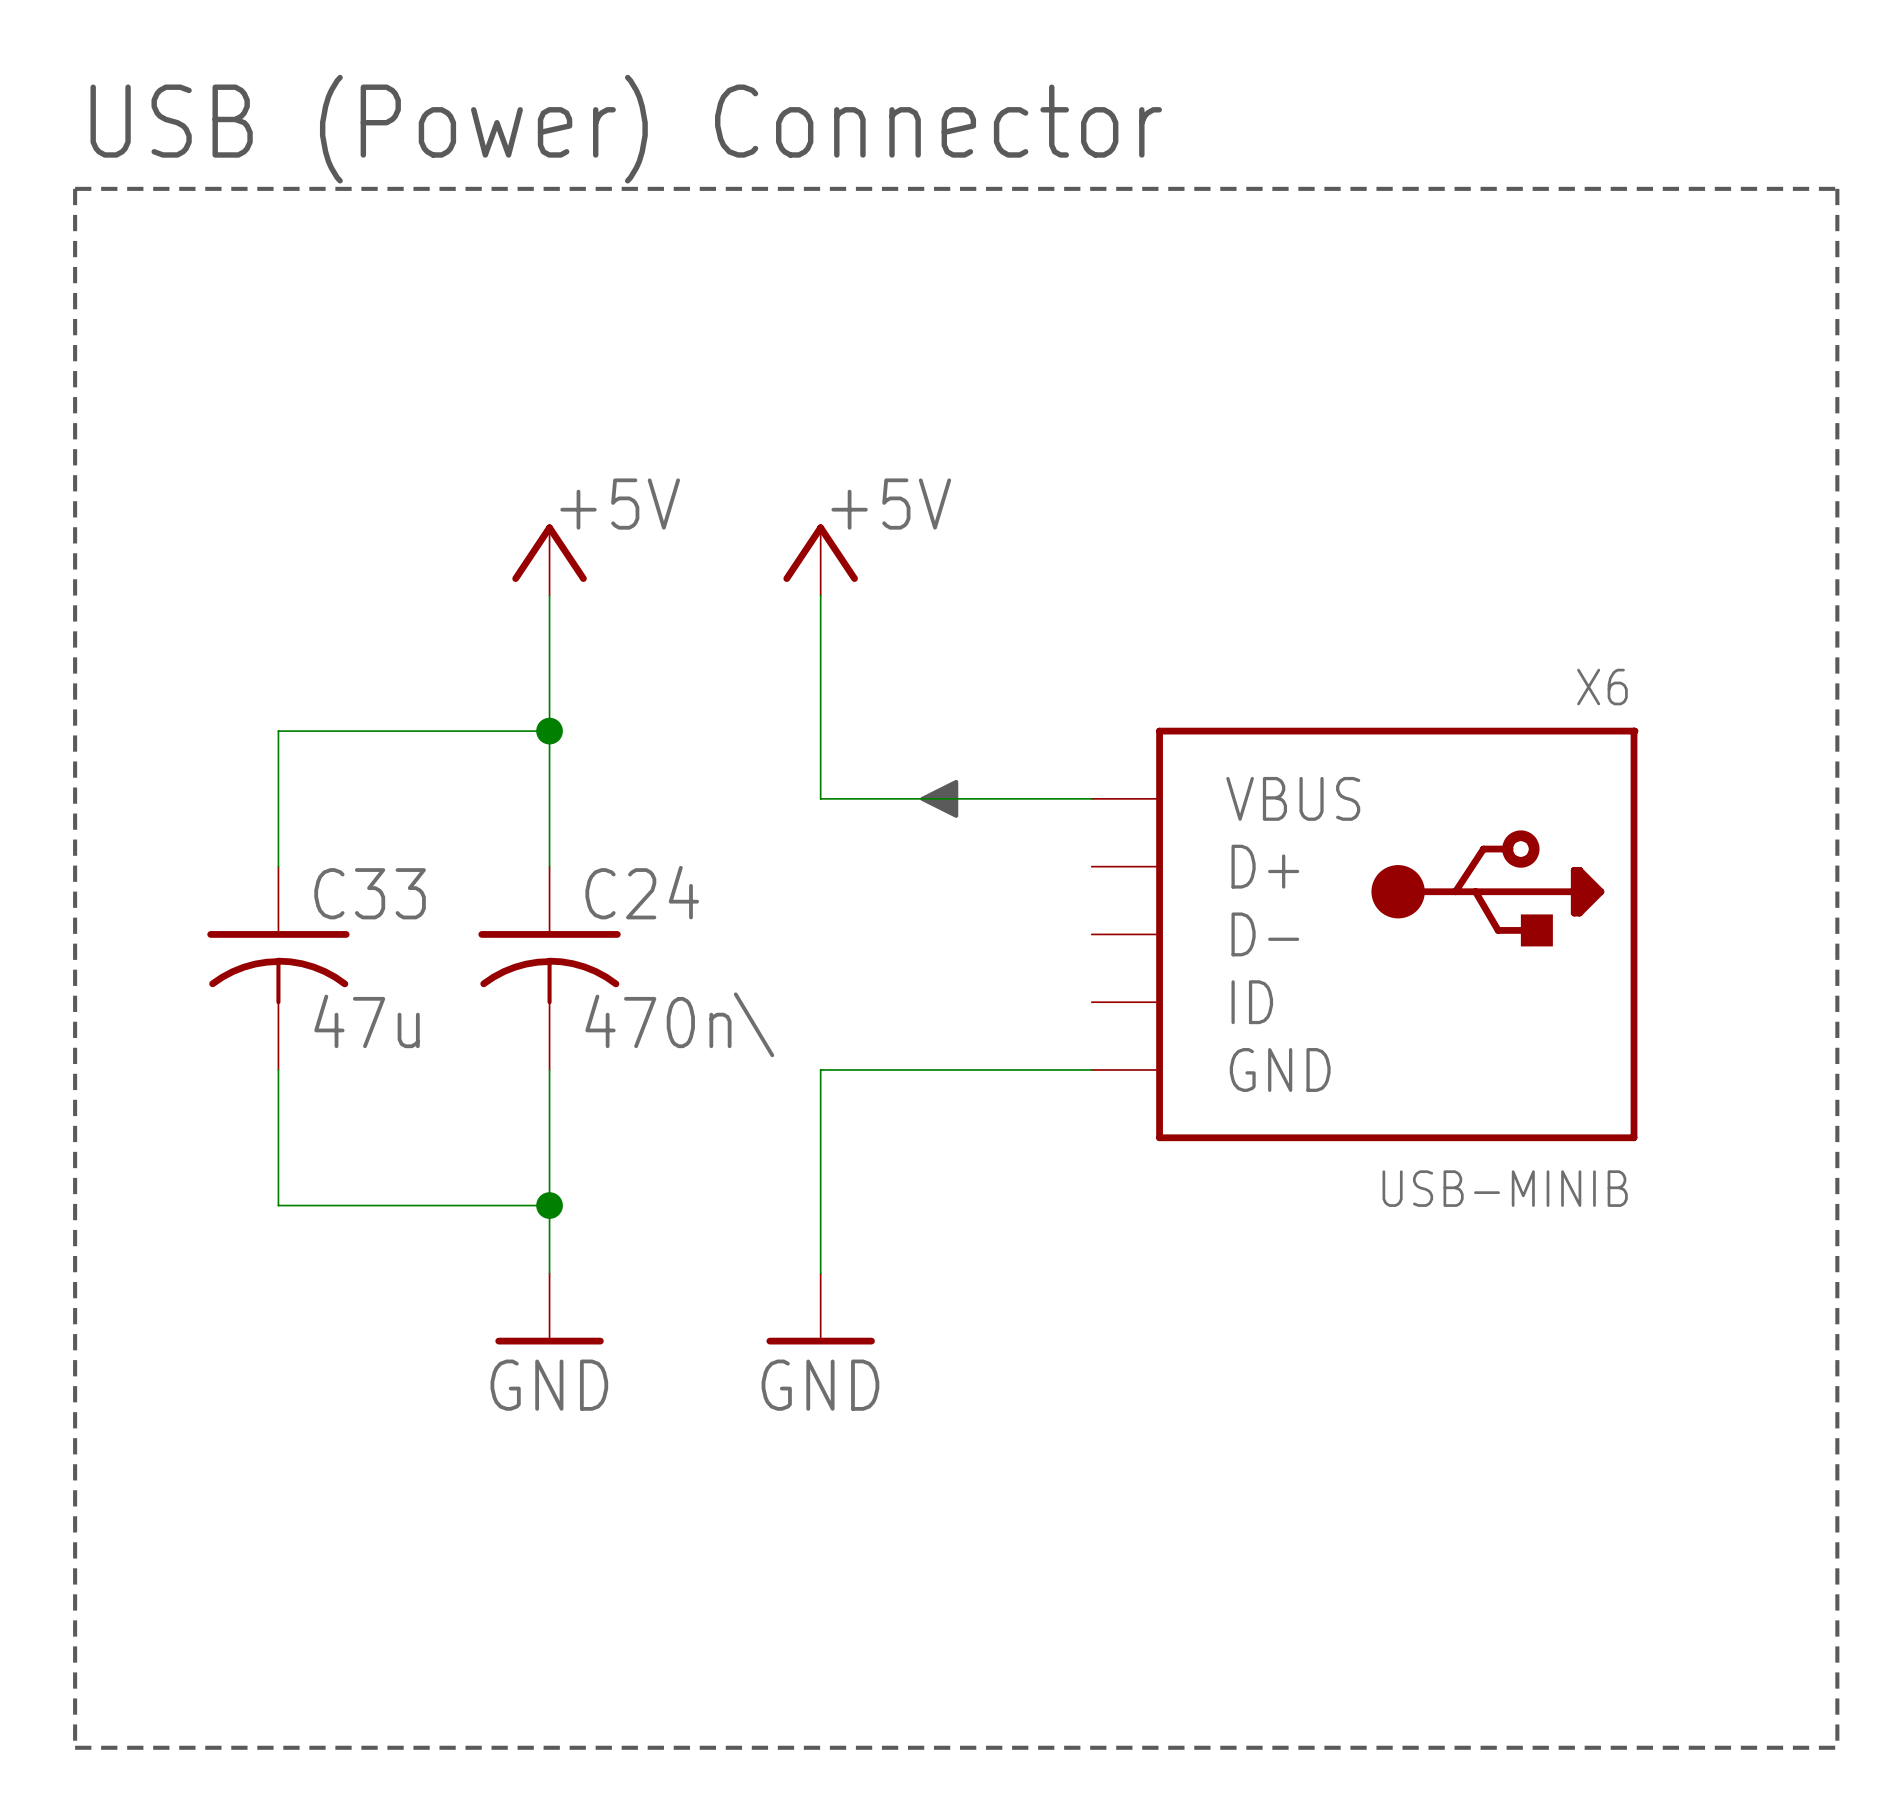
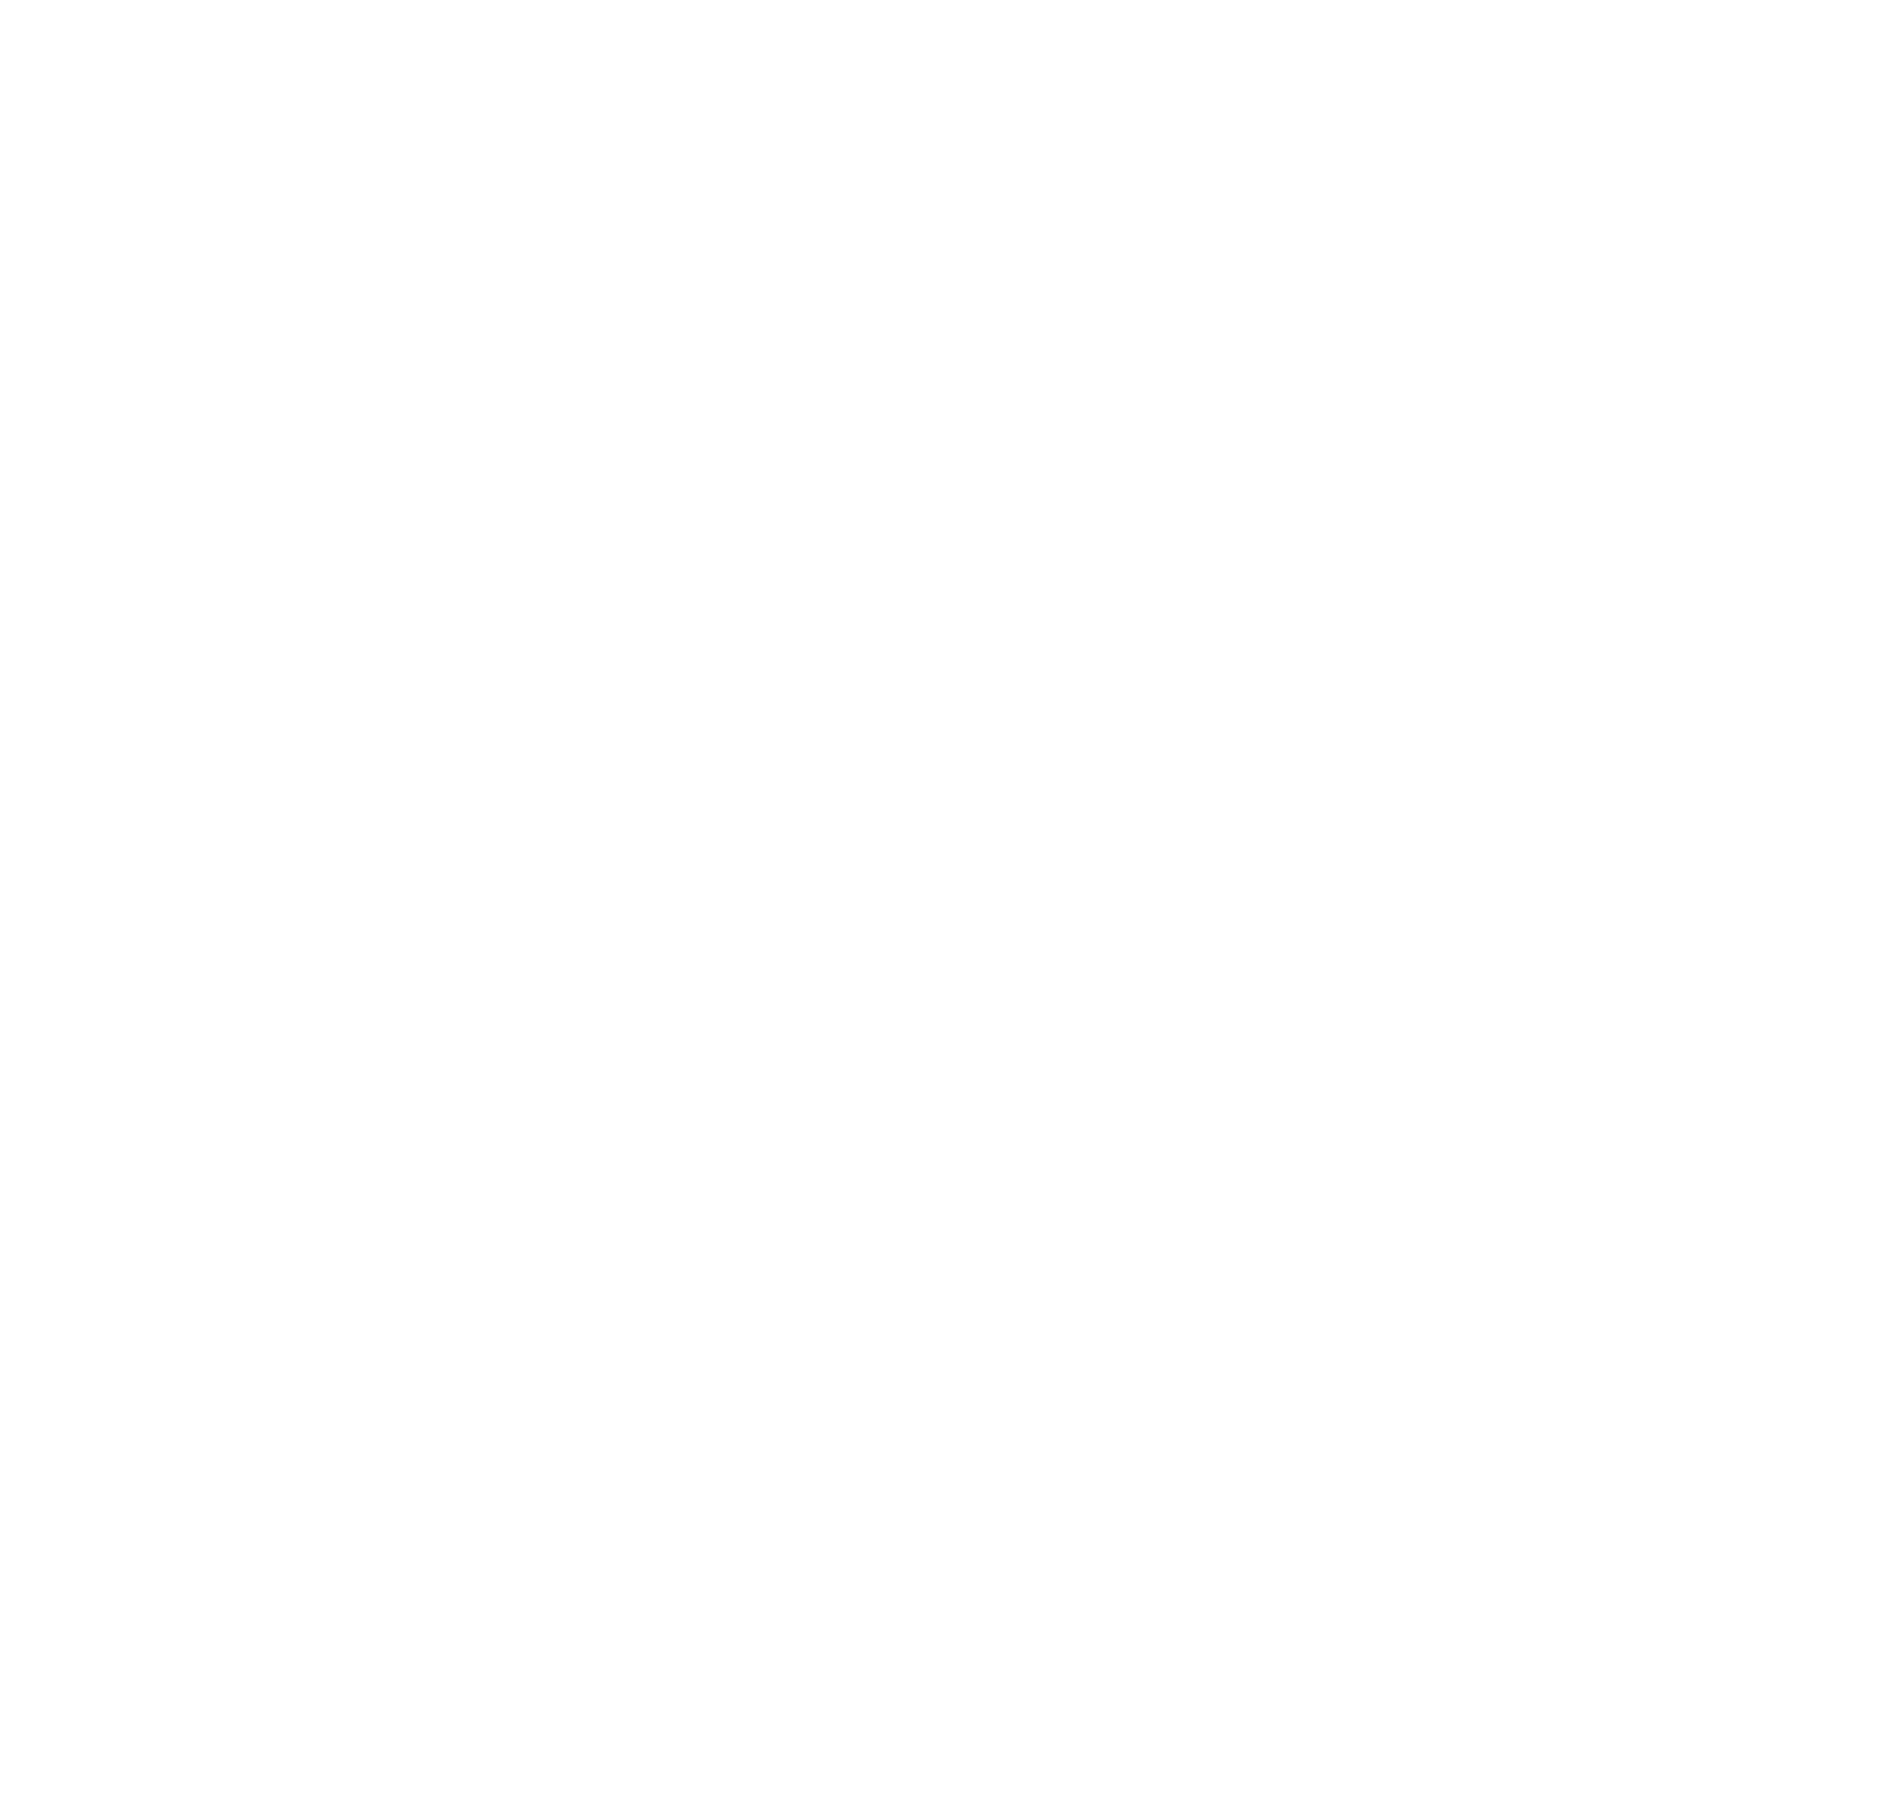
text: USB (Power) Connector (626, 129) -> none
line: (75, 188) (75, 1747) (1837, 1747) (1837, 188) (75, 188) -> none
power symbol: +5V (549, 559) -> none
power symbol: +5V (820, 559) -> none
wire: (549, 595) (549, 866) -> none
wire: (820, 595) (820, 798) (1091, 798) -> none
wire: (549, 731) (278, 731) (278, 866) -> none
junction: (549, 731) -> none
part: (939, 798) -> none
X6: USB-MINIB (1365, 934) -> none
C33: 47u (278, 968) -> none
C24: 470n\ (549, 968) -> none
wire: (278, 1069) (278, 1205) (549, 1205) -> none
wire: (549, 1069) (549, 1273) -> none
wire: (1091, 1069) (820, 1069) (820, 1273) -> none
junction: (549, 1205) -> none
power symbol: GND (549, 1308) -> none
power symbol: GND (820, 1308) -> none

